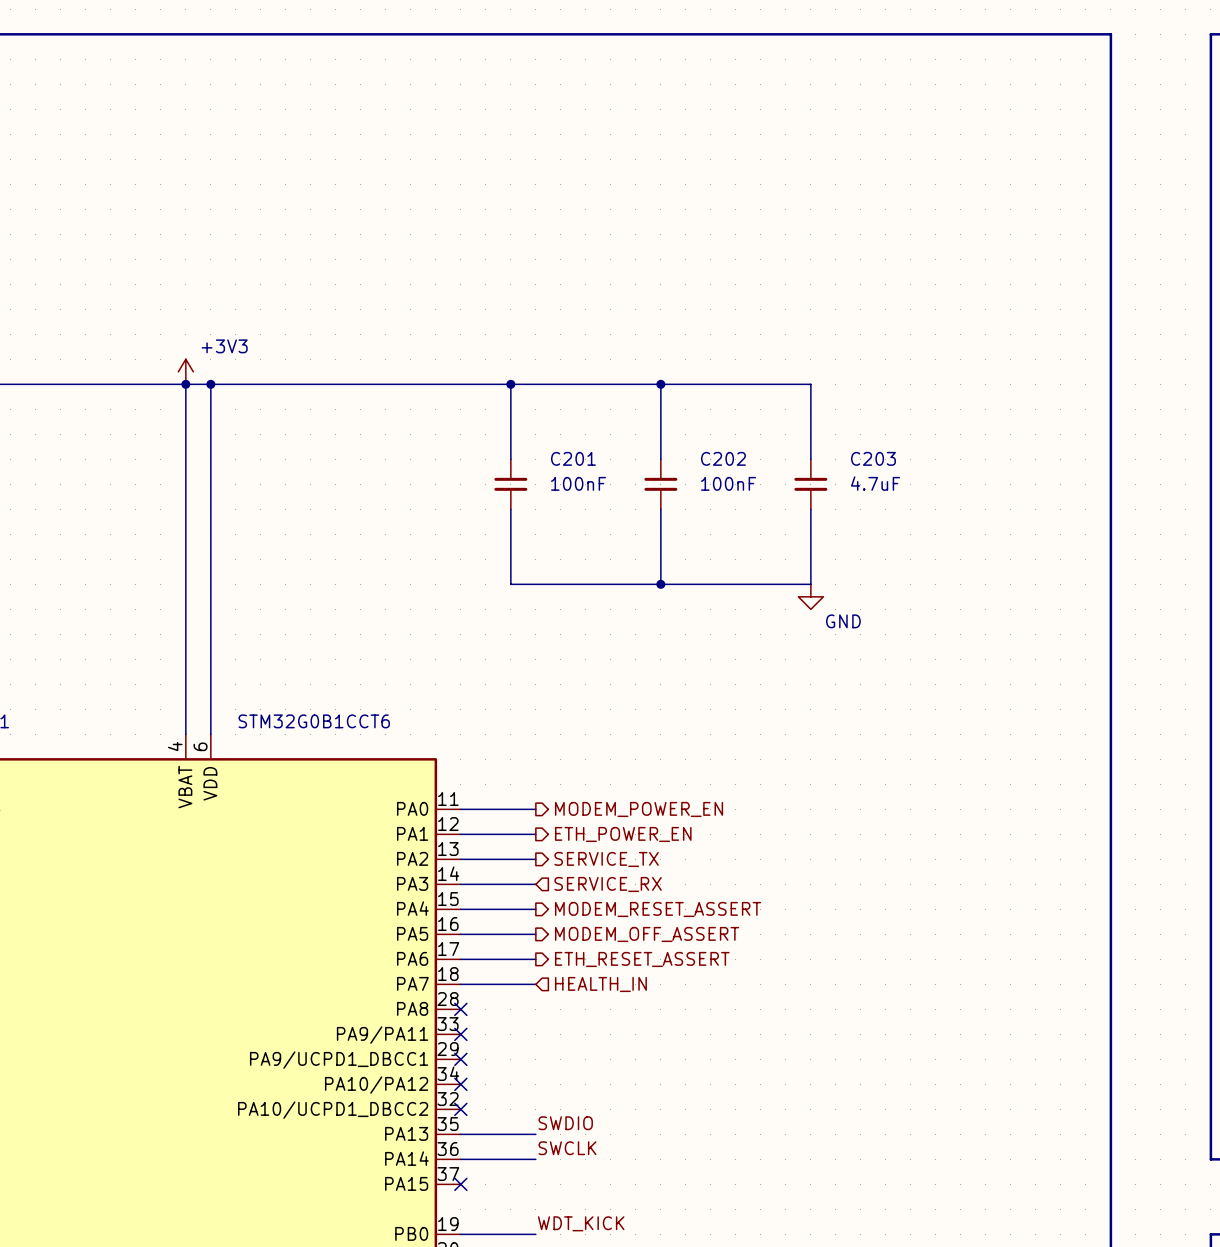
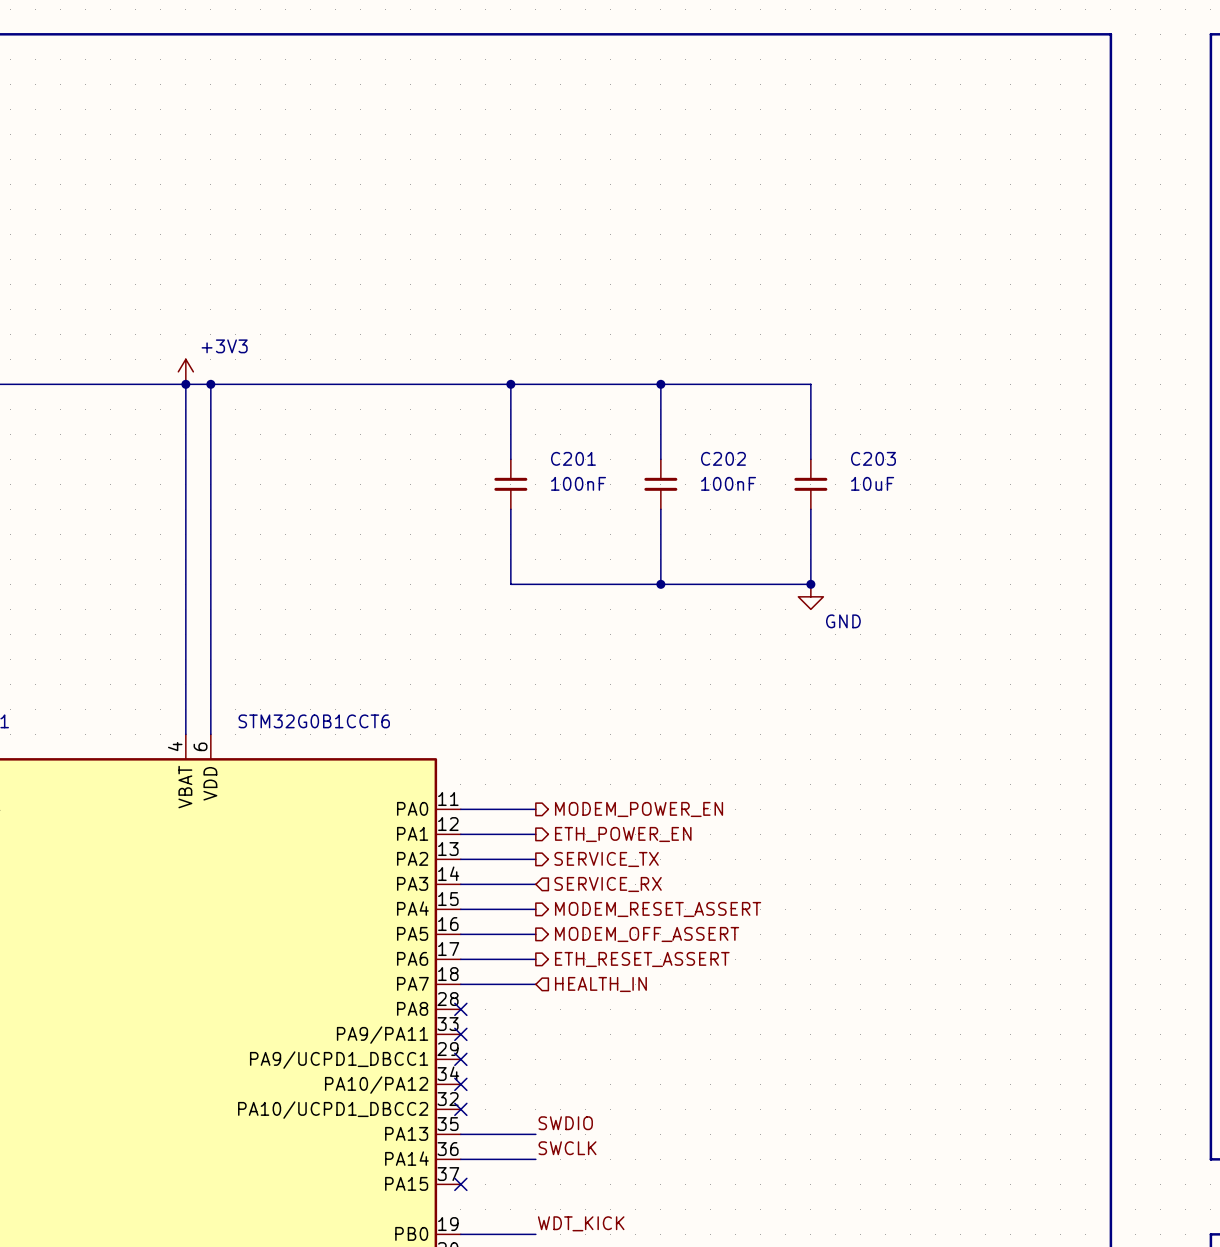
C203 value: 4.7uF (875, 483) -> 10uF (872, 483)
junction: none -> (810, 584)

